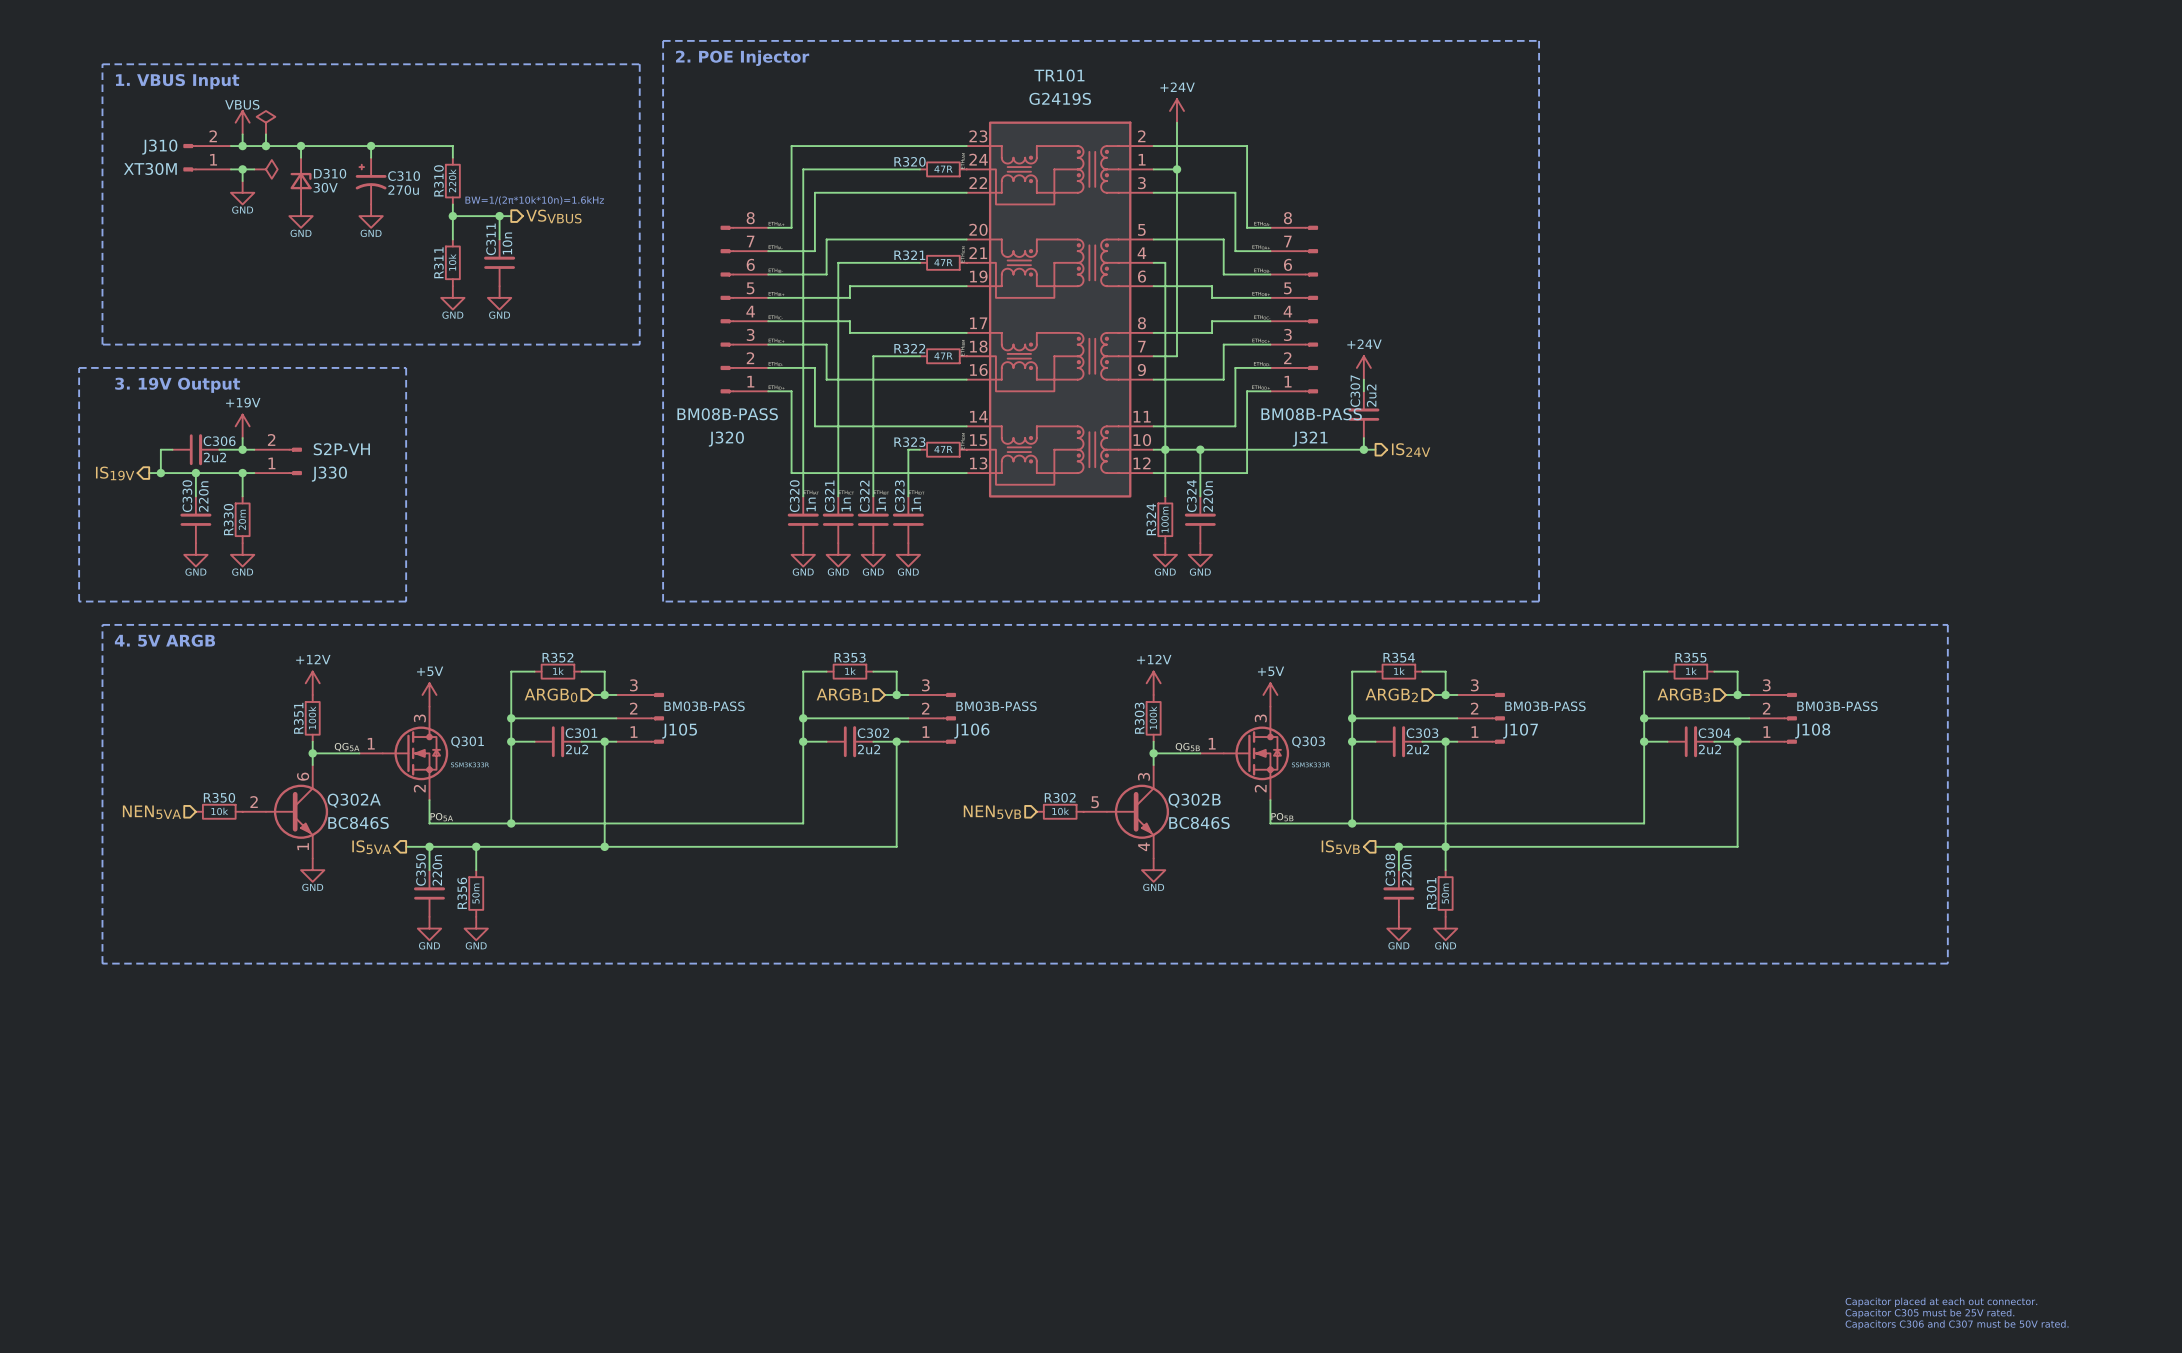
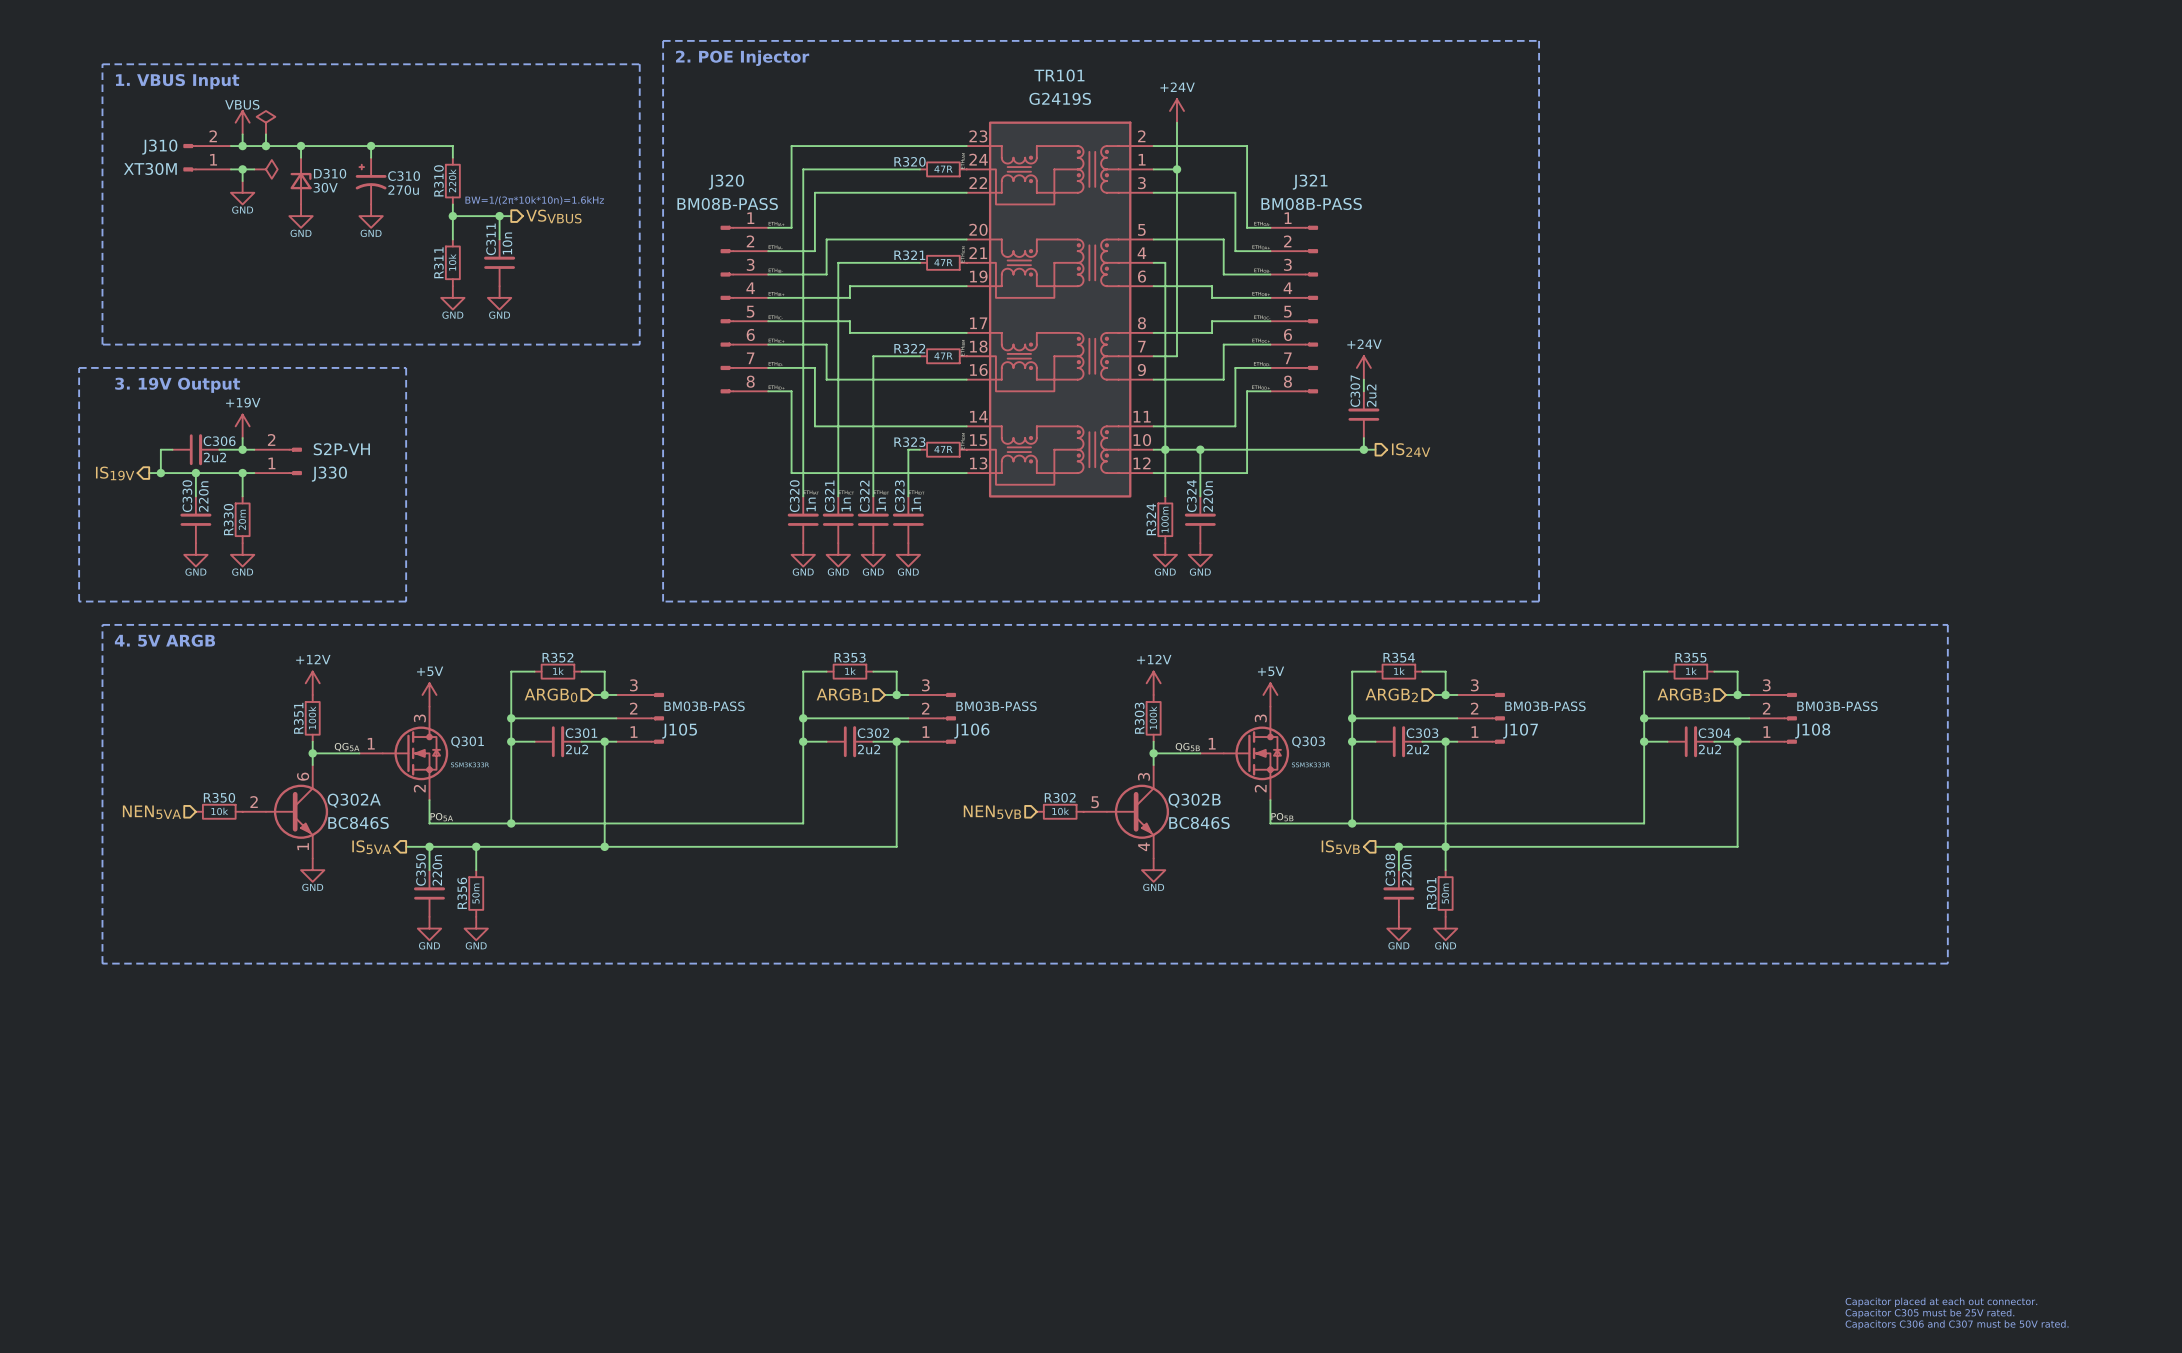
J320 flip: as is (727, 309) -> up-down (727, 309)
J321 flip: as is (1311, 309) -> up-down (1311, 309)

